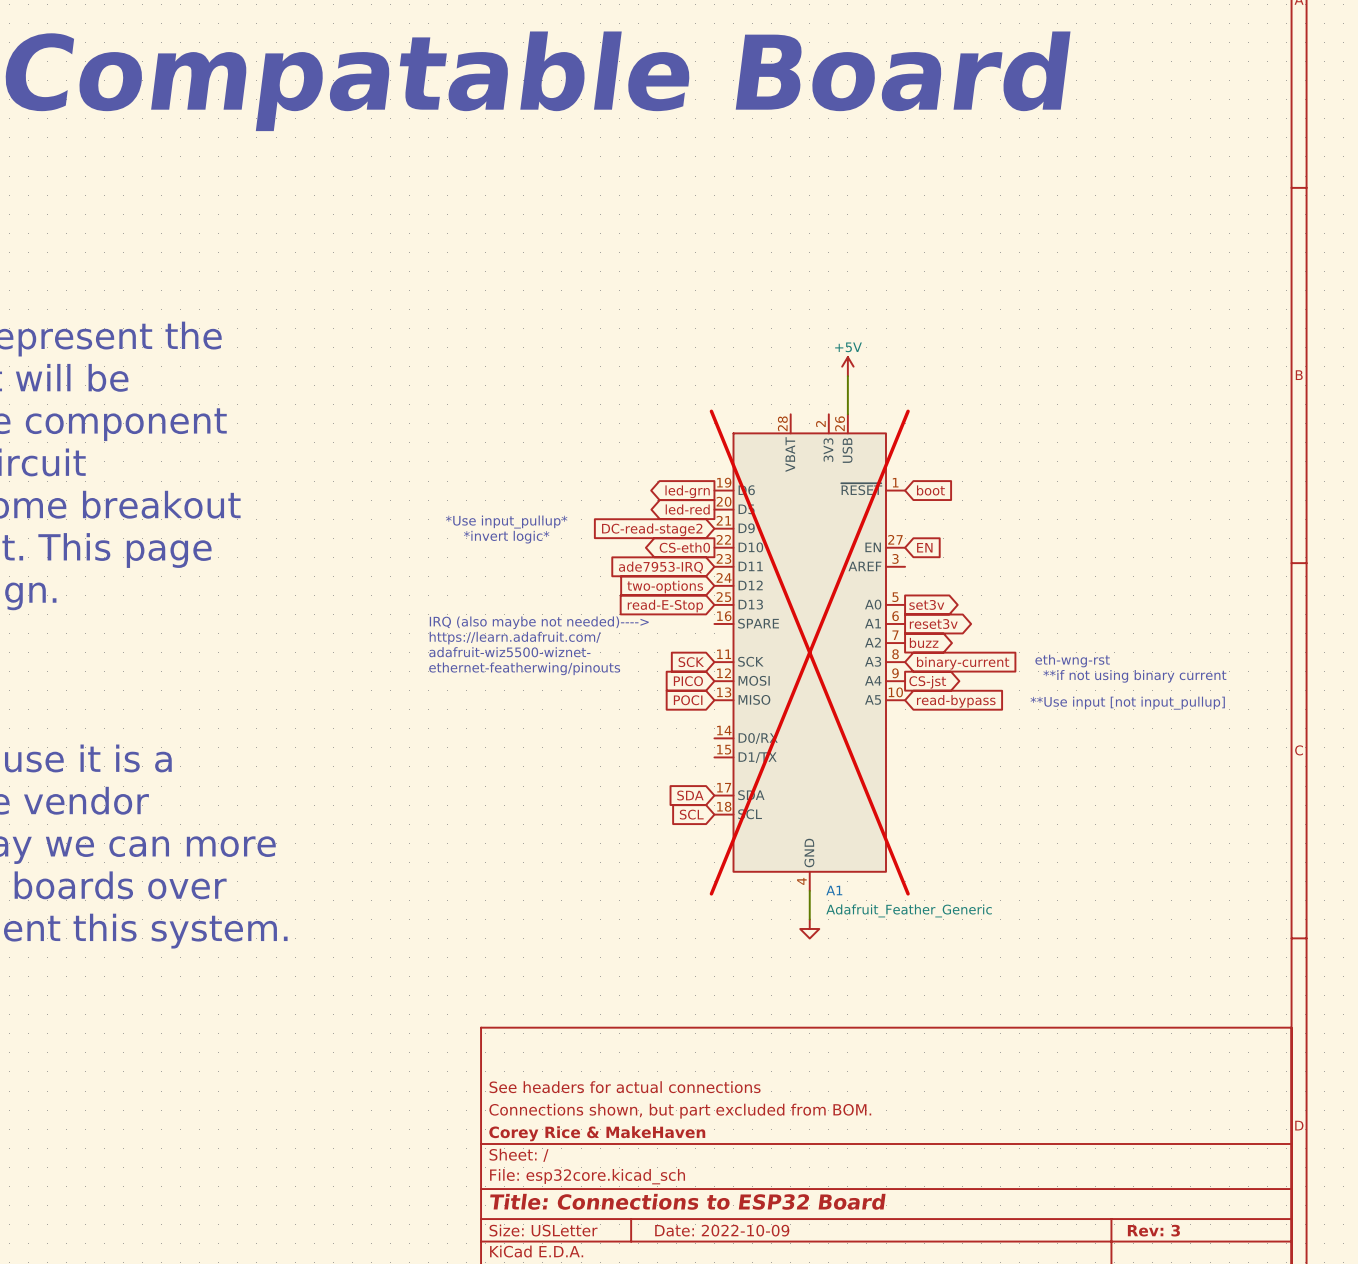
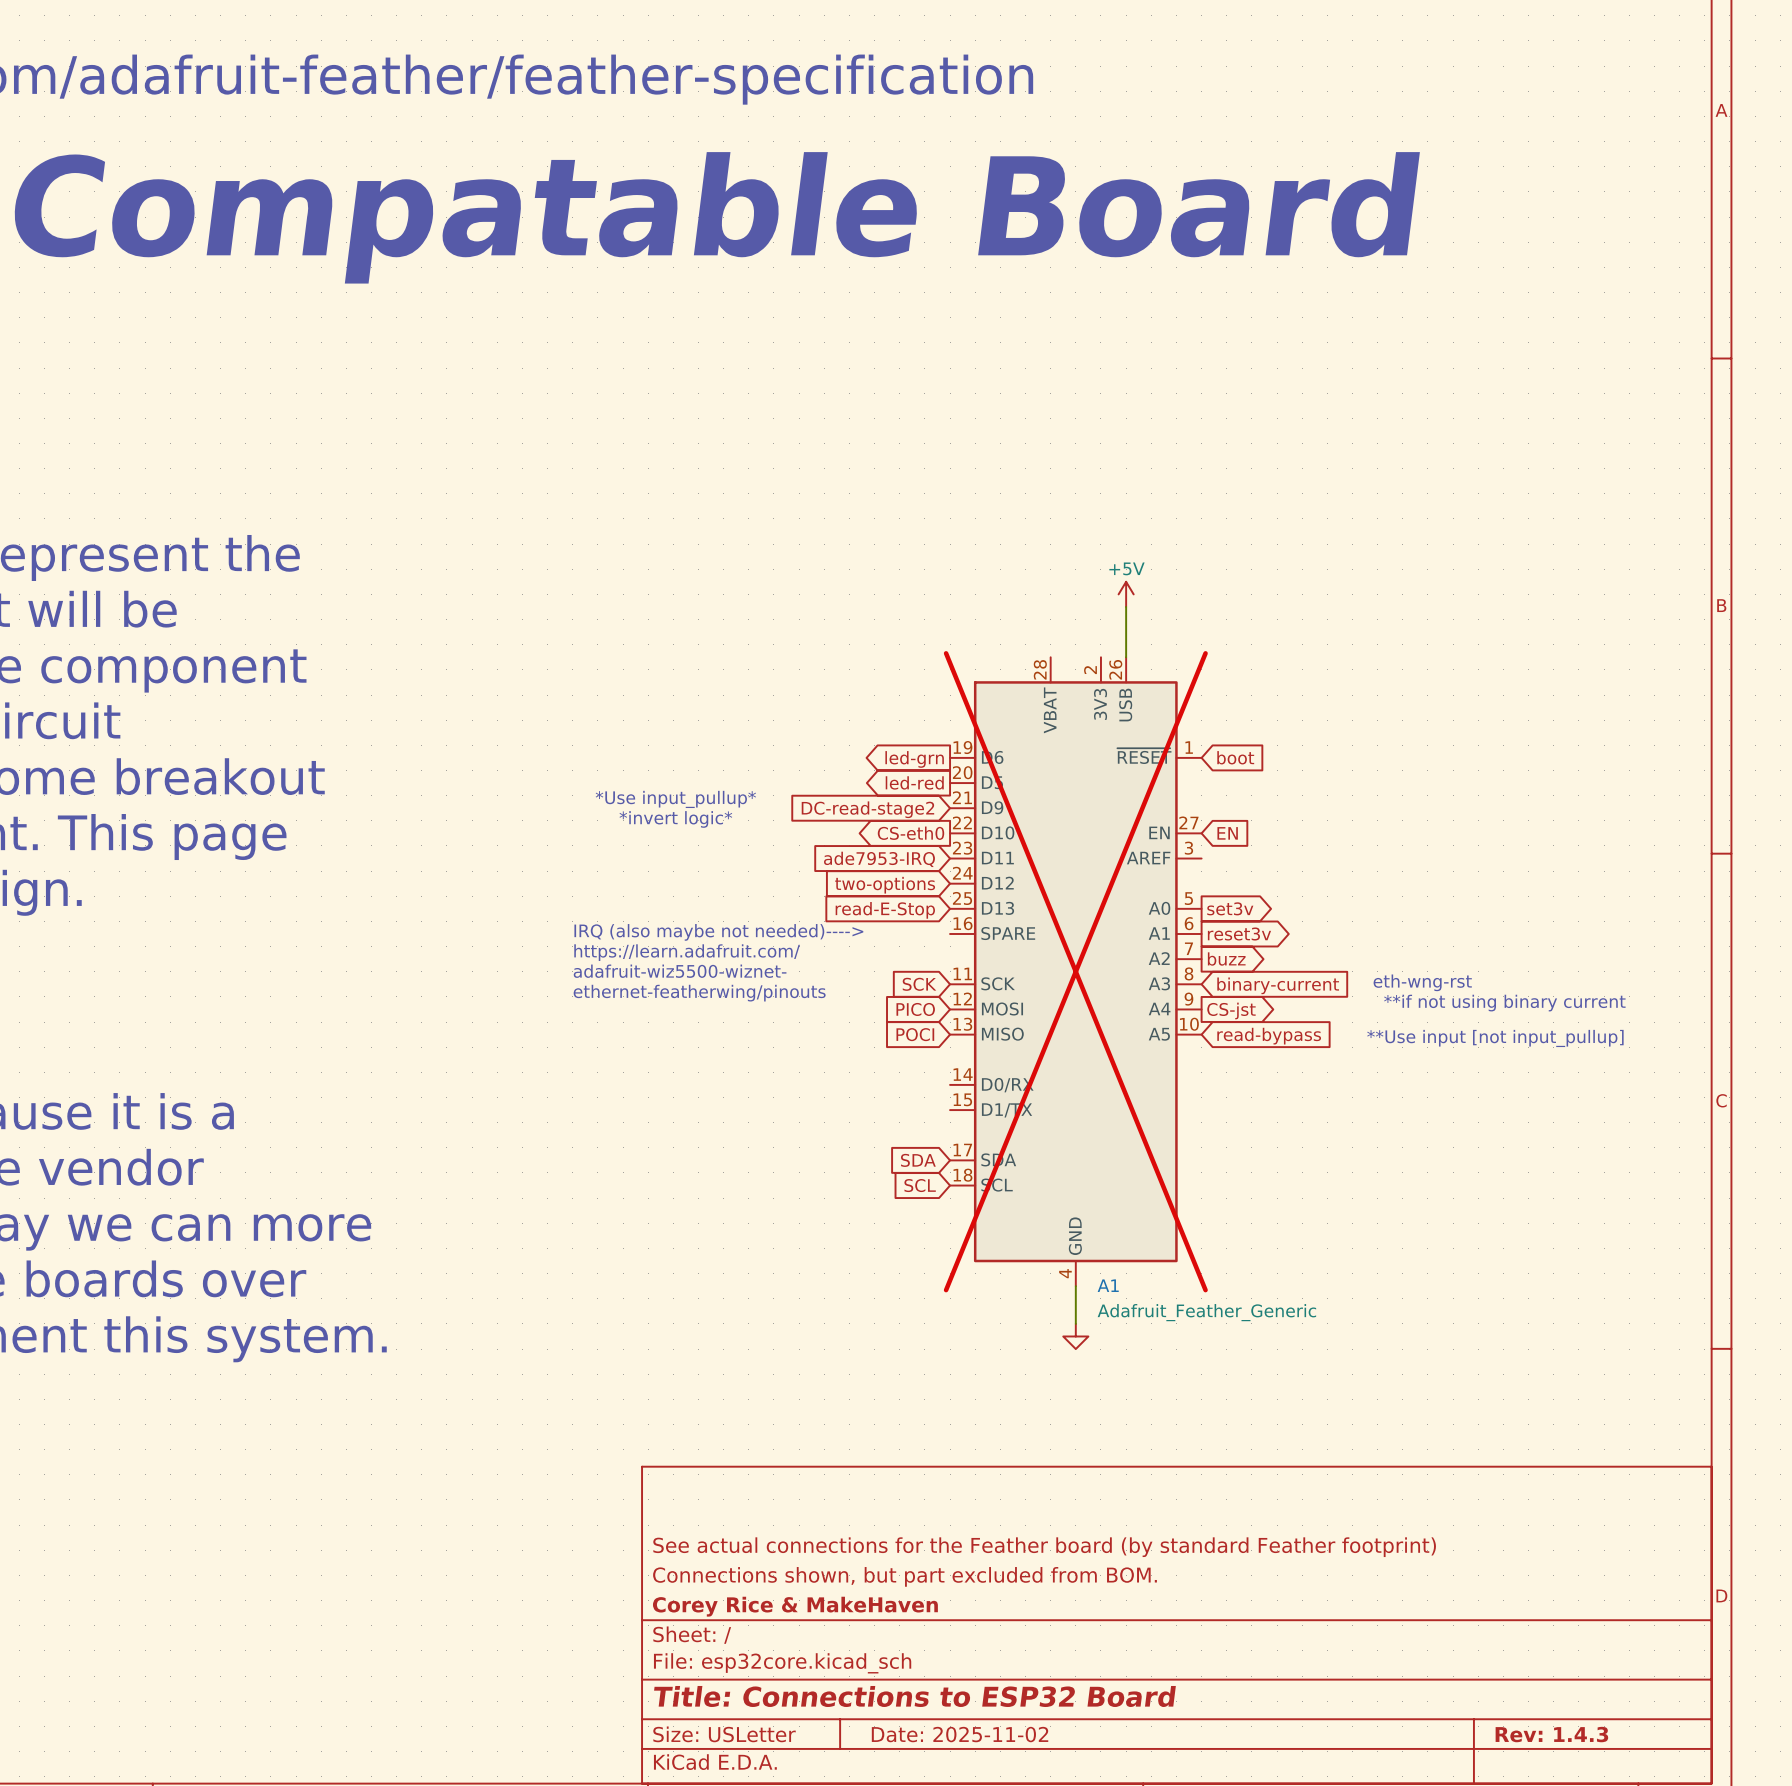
title block: See headers for actual connections (625, 1087) -> See actual connections for the Feather board (by standard Feather footprint) (1044, 1547)
title block: Date: 2022-10-09 (722, 1230) -> Date: 2025-11-02 (960, 1734)
title block: Rev: 3 (1153, 1230) -> Rev: 1.4.3 (1551, 1734)

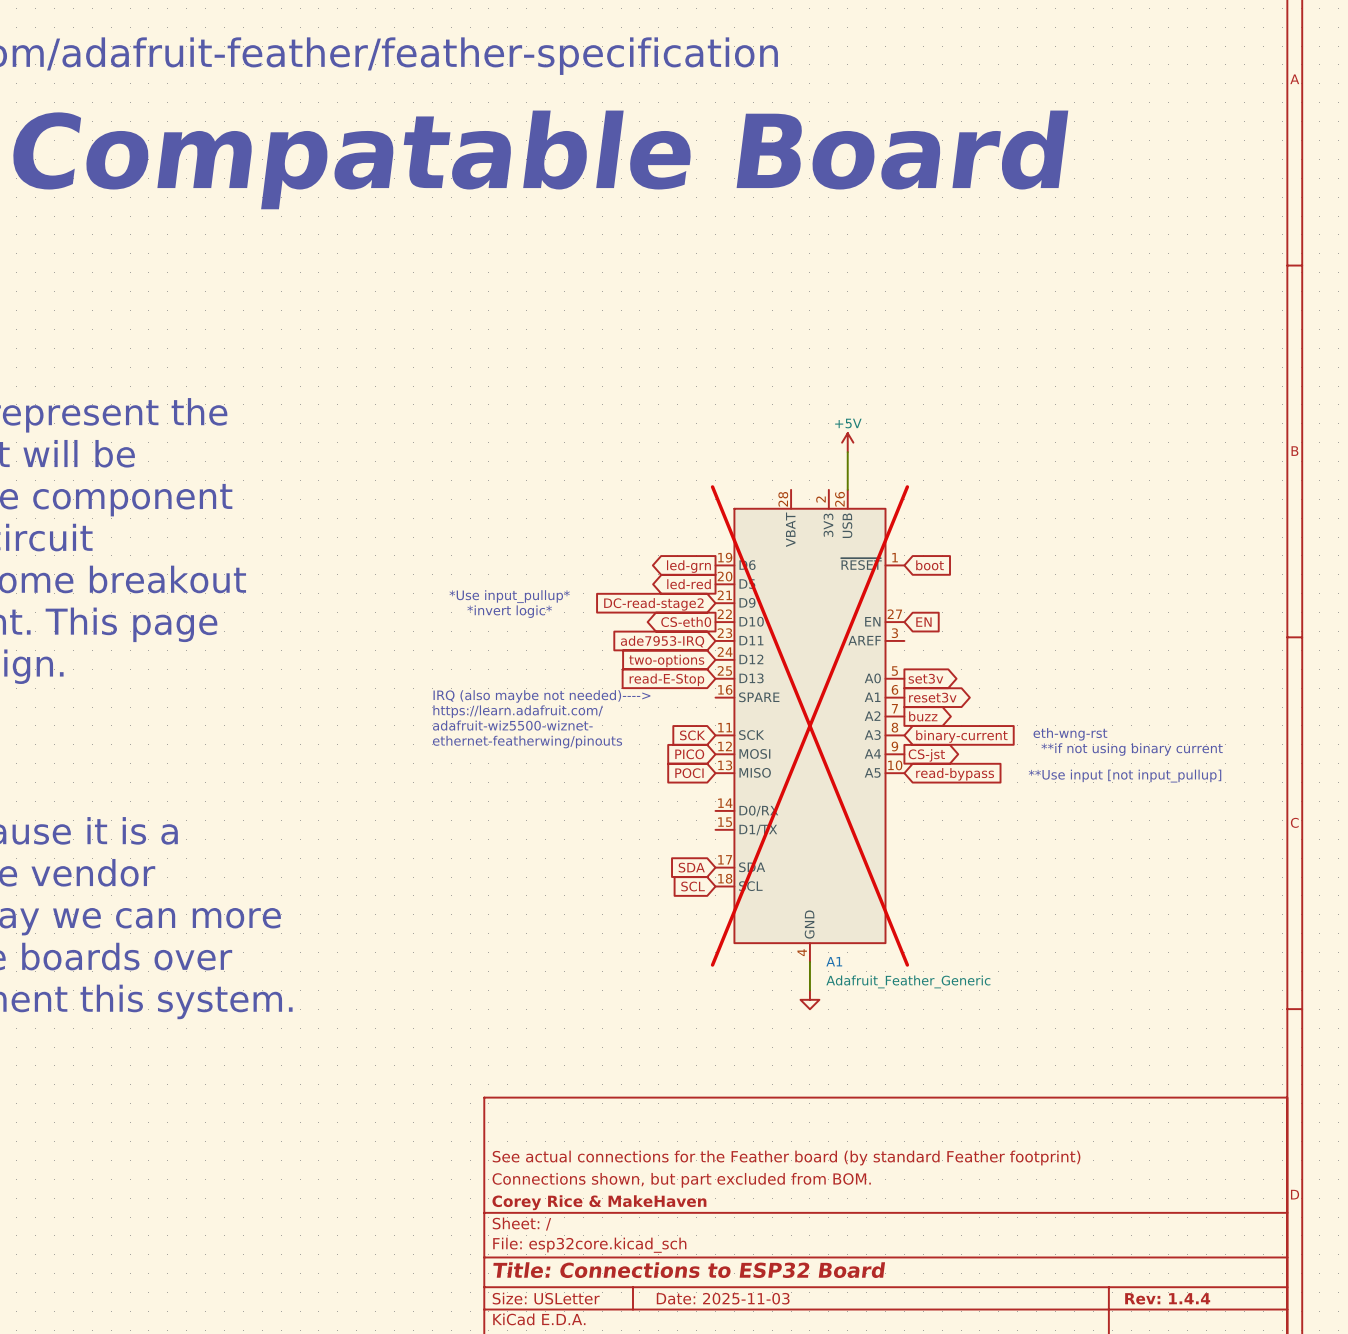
title block: Date: 2025-11-02 (960, 1734) -> Date: 2025-11-03 (723, 1298)
title block: Rev: 1.4.3 (1551, 1734) -> Rev: 1.4.4 (1167, 1298)

